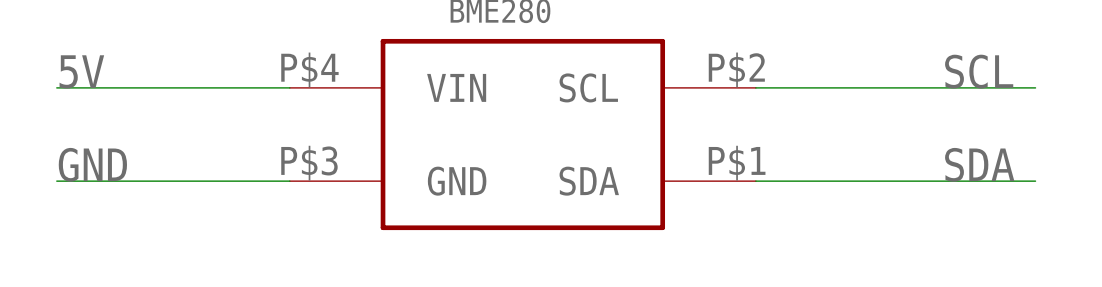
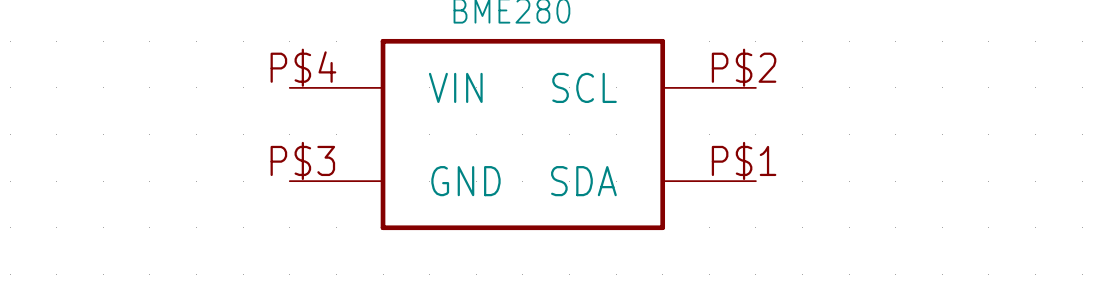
label: 5V (81, 71) -> none
label: SCL (979, 71) -> none
wire: (56, 87) (289, 87) -> none
wire: (755, 87) (1035, 87) -> none
label: GND (92, 164) -> none
label: SDA (979, 164) -> none
wire: (56, 181) (289, 181) -> none
wire: (755, 181) (1035, 181) -> none

